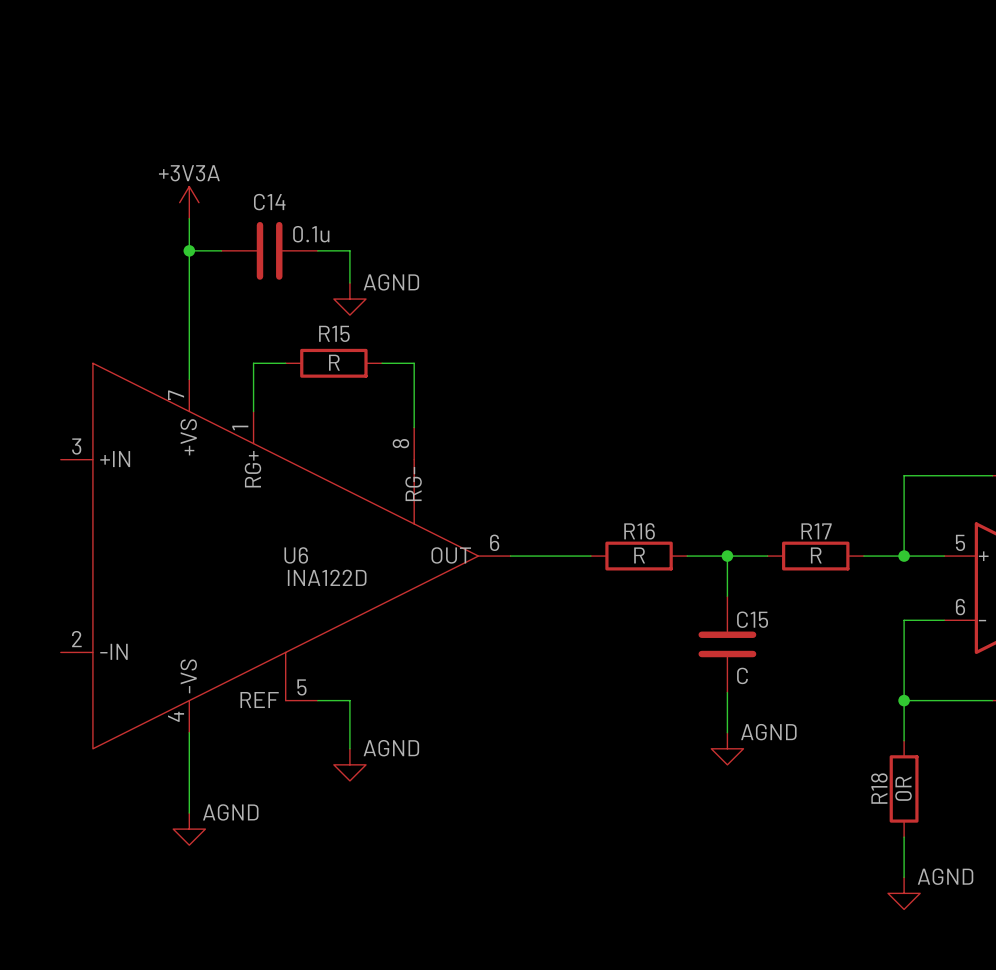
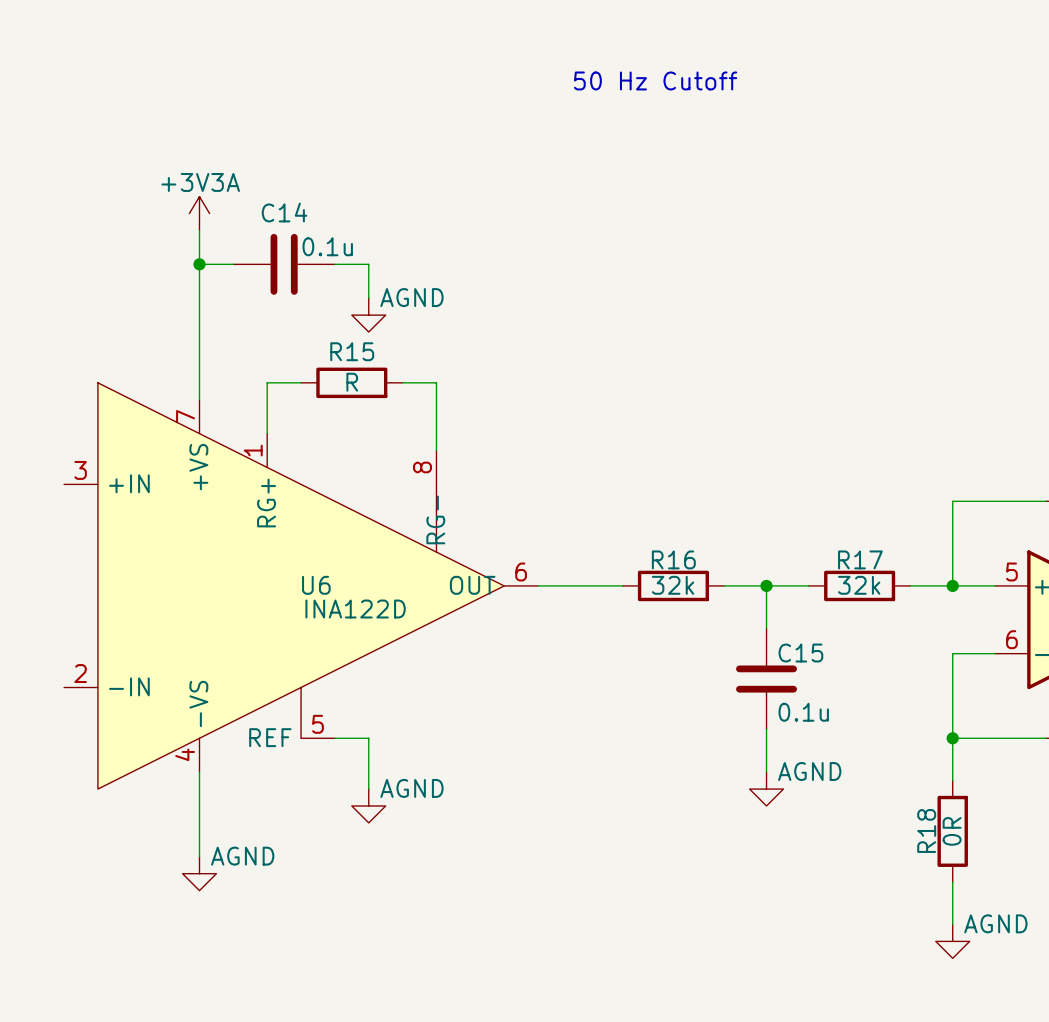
text: none -> 50 Hz Cutoff (655, 80)
R16 value: R (639, 555) -> 32k (673, 585)
R17 value: R (816, 555) -> 32k (859, 585)
C15 value: C (742, 675) -> 0.1u (803, 712)

